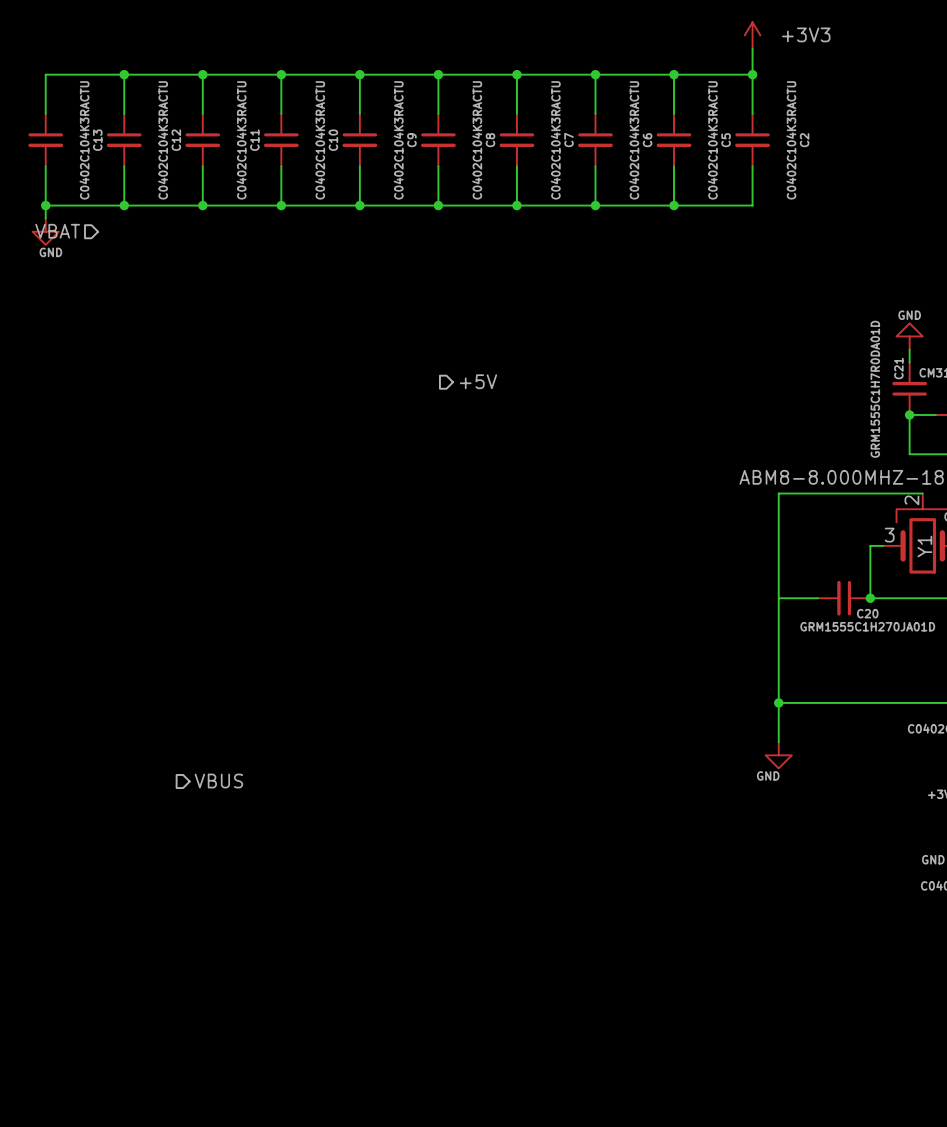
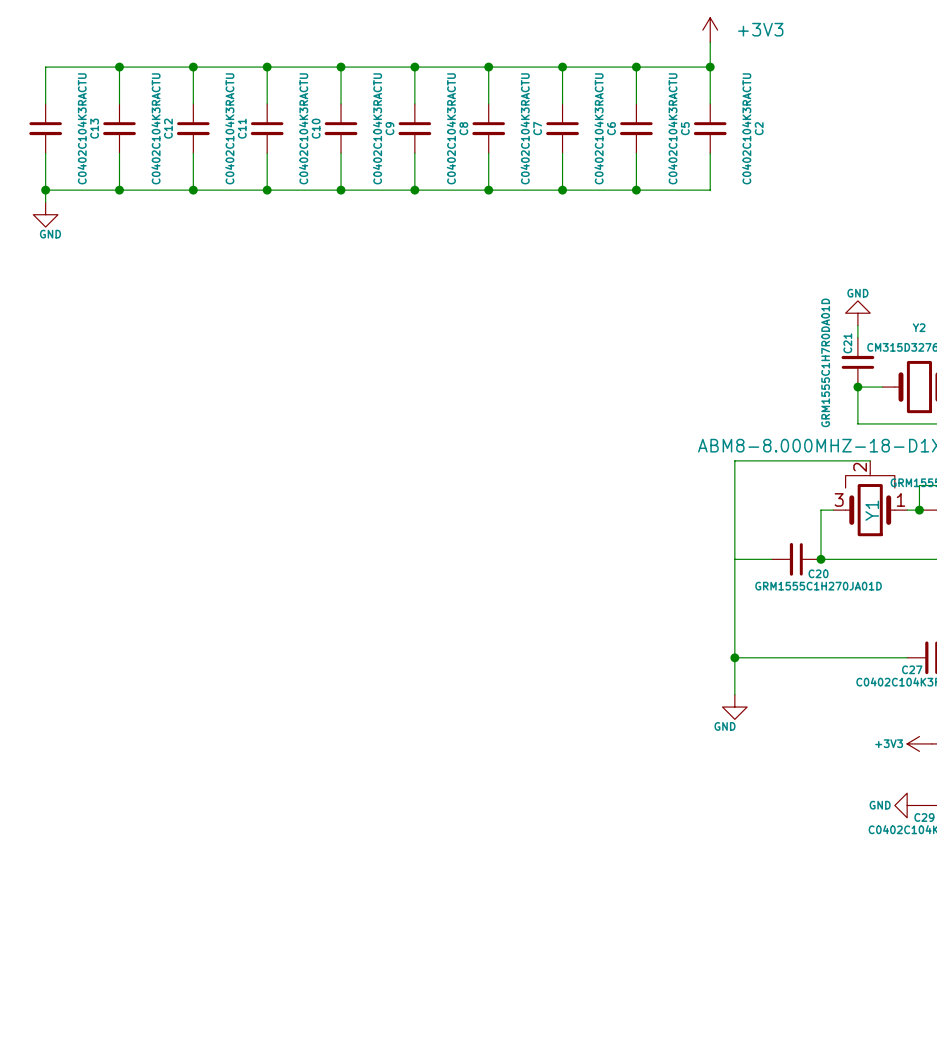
hierarchical label: VBAT (57, 231) -> none
hierarchical label: +5V (478, 381) -> none
hierarchical label: VBUS (218, 781) -> none

